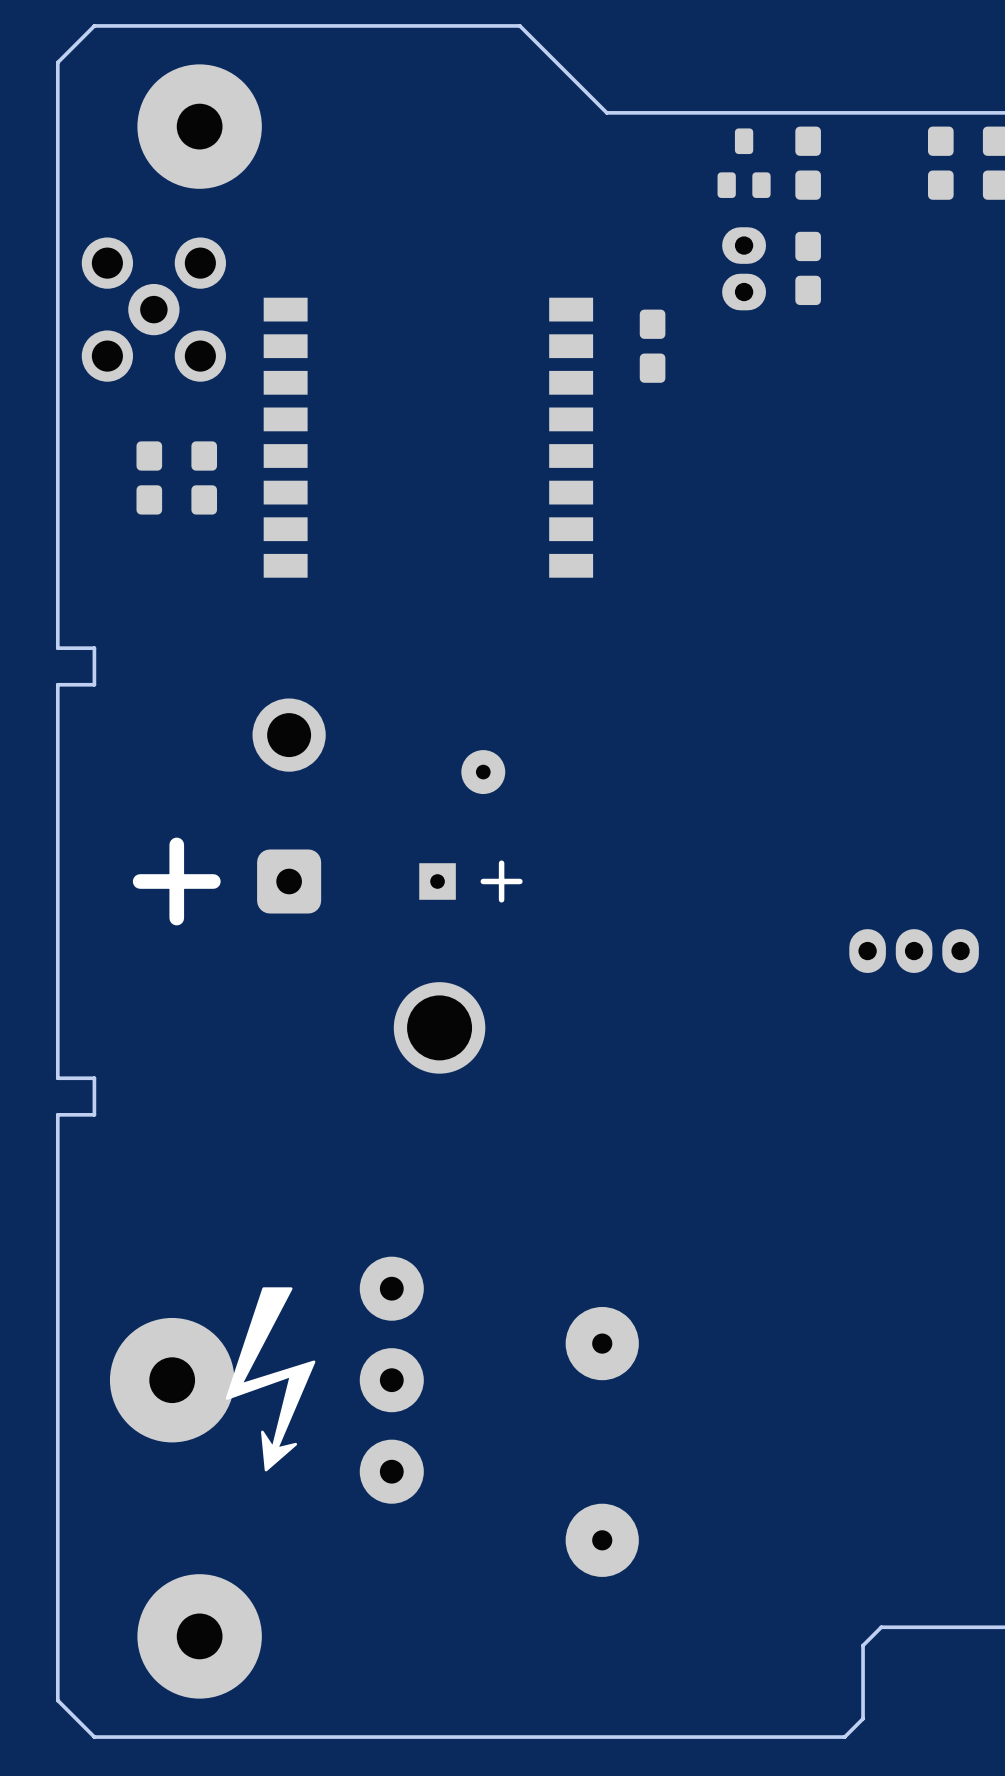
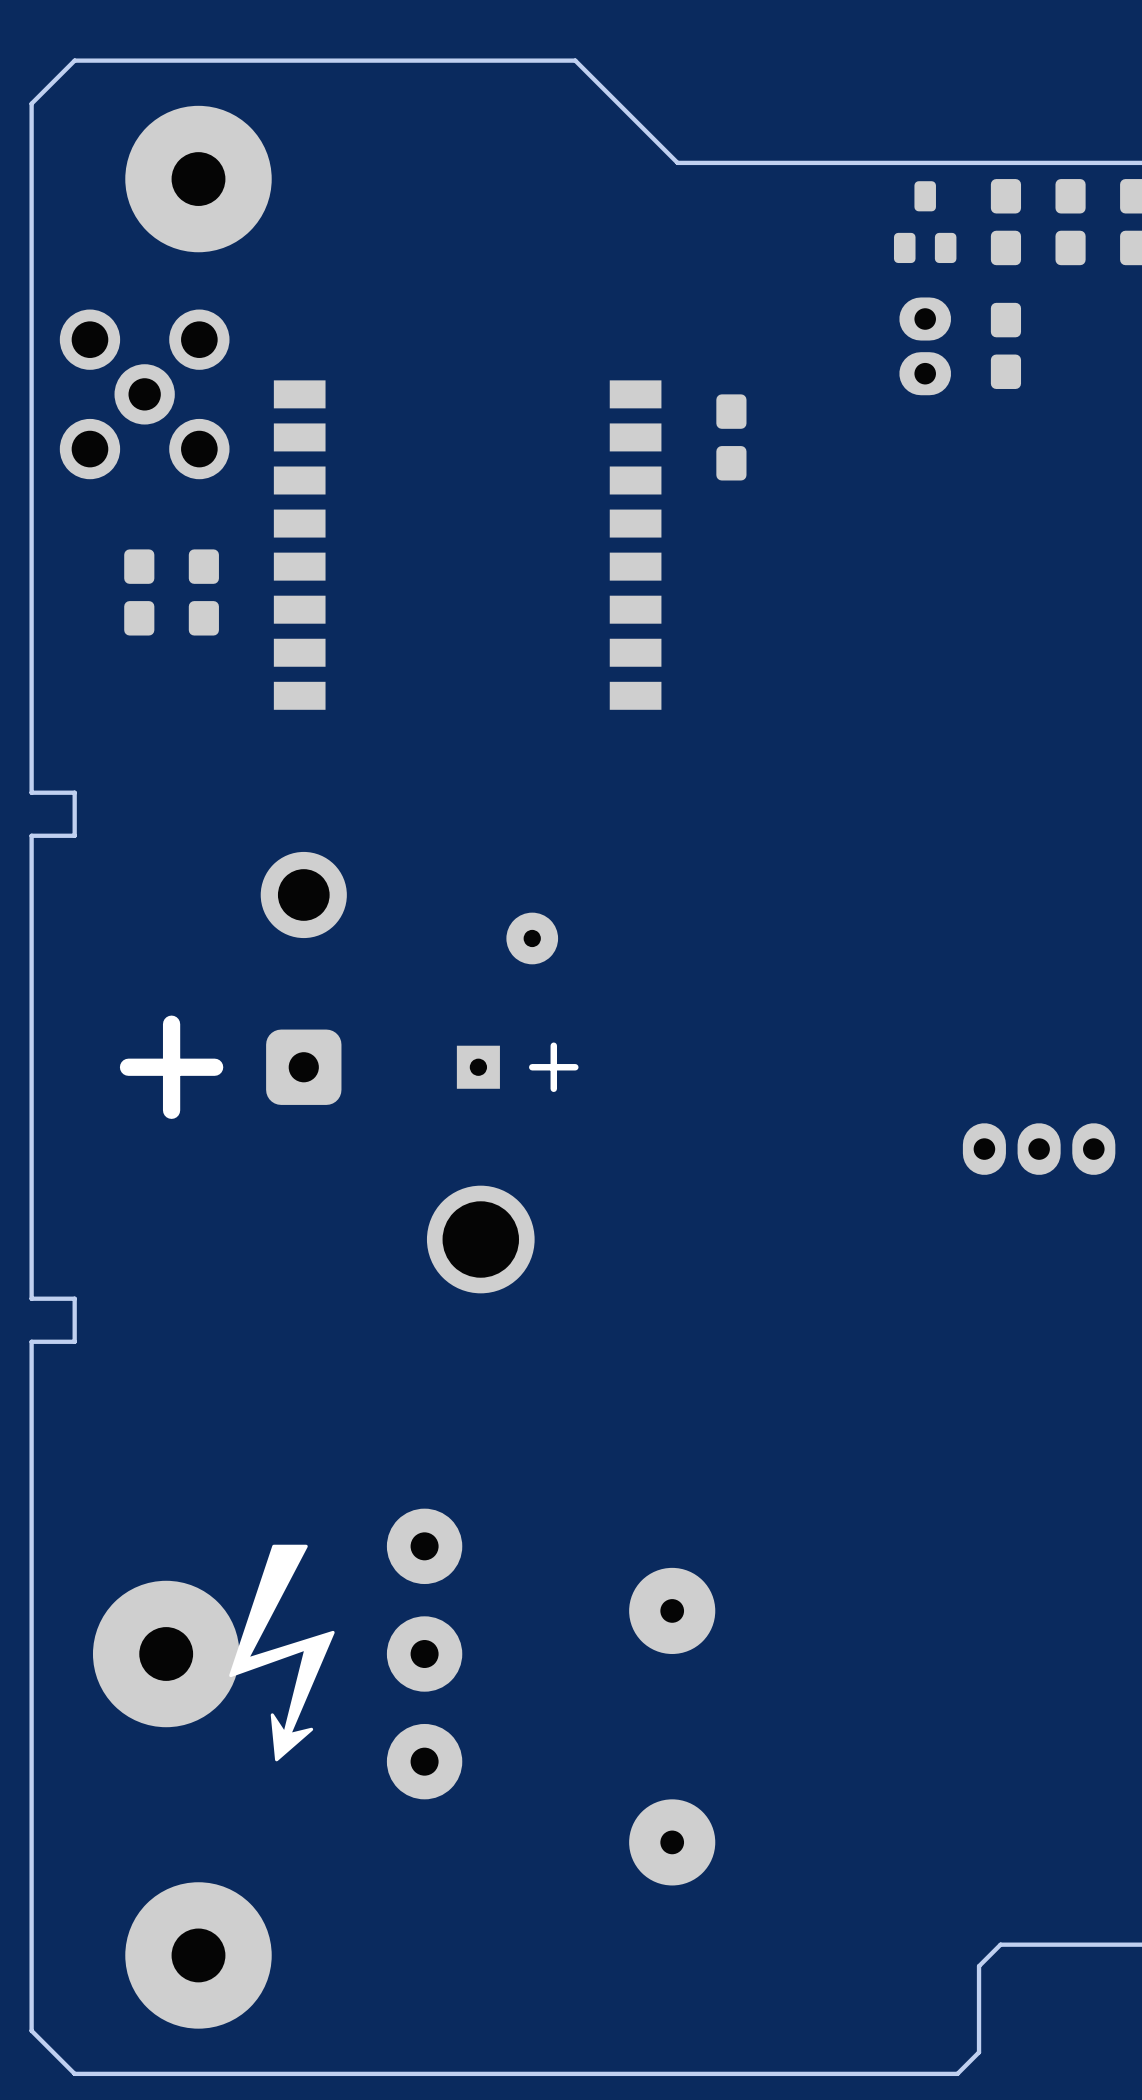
part footprint: [795, 126, 821, 200] -> [893, 181, 957, 264]
part: (744, 163) -> none
part: none -> (1005, 222)
part footprint: [795, 231, 821, 306] -> [899, 297, 952, 396]
part: (744, 268) -> none
part: none -> (1005, 345)

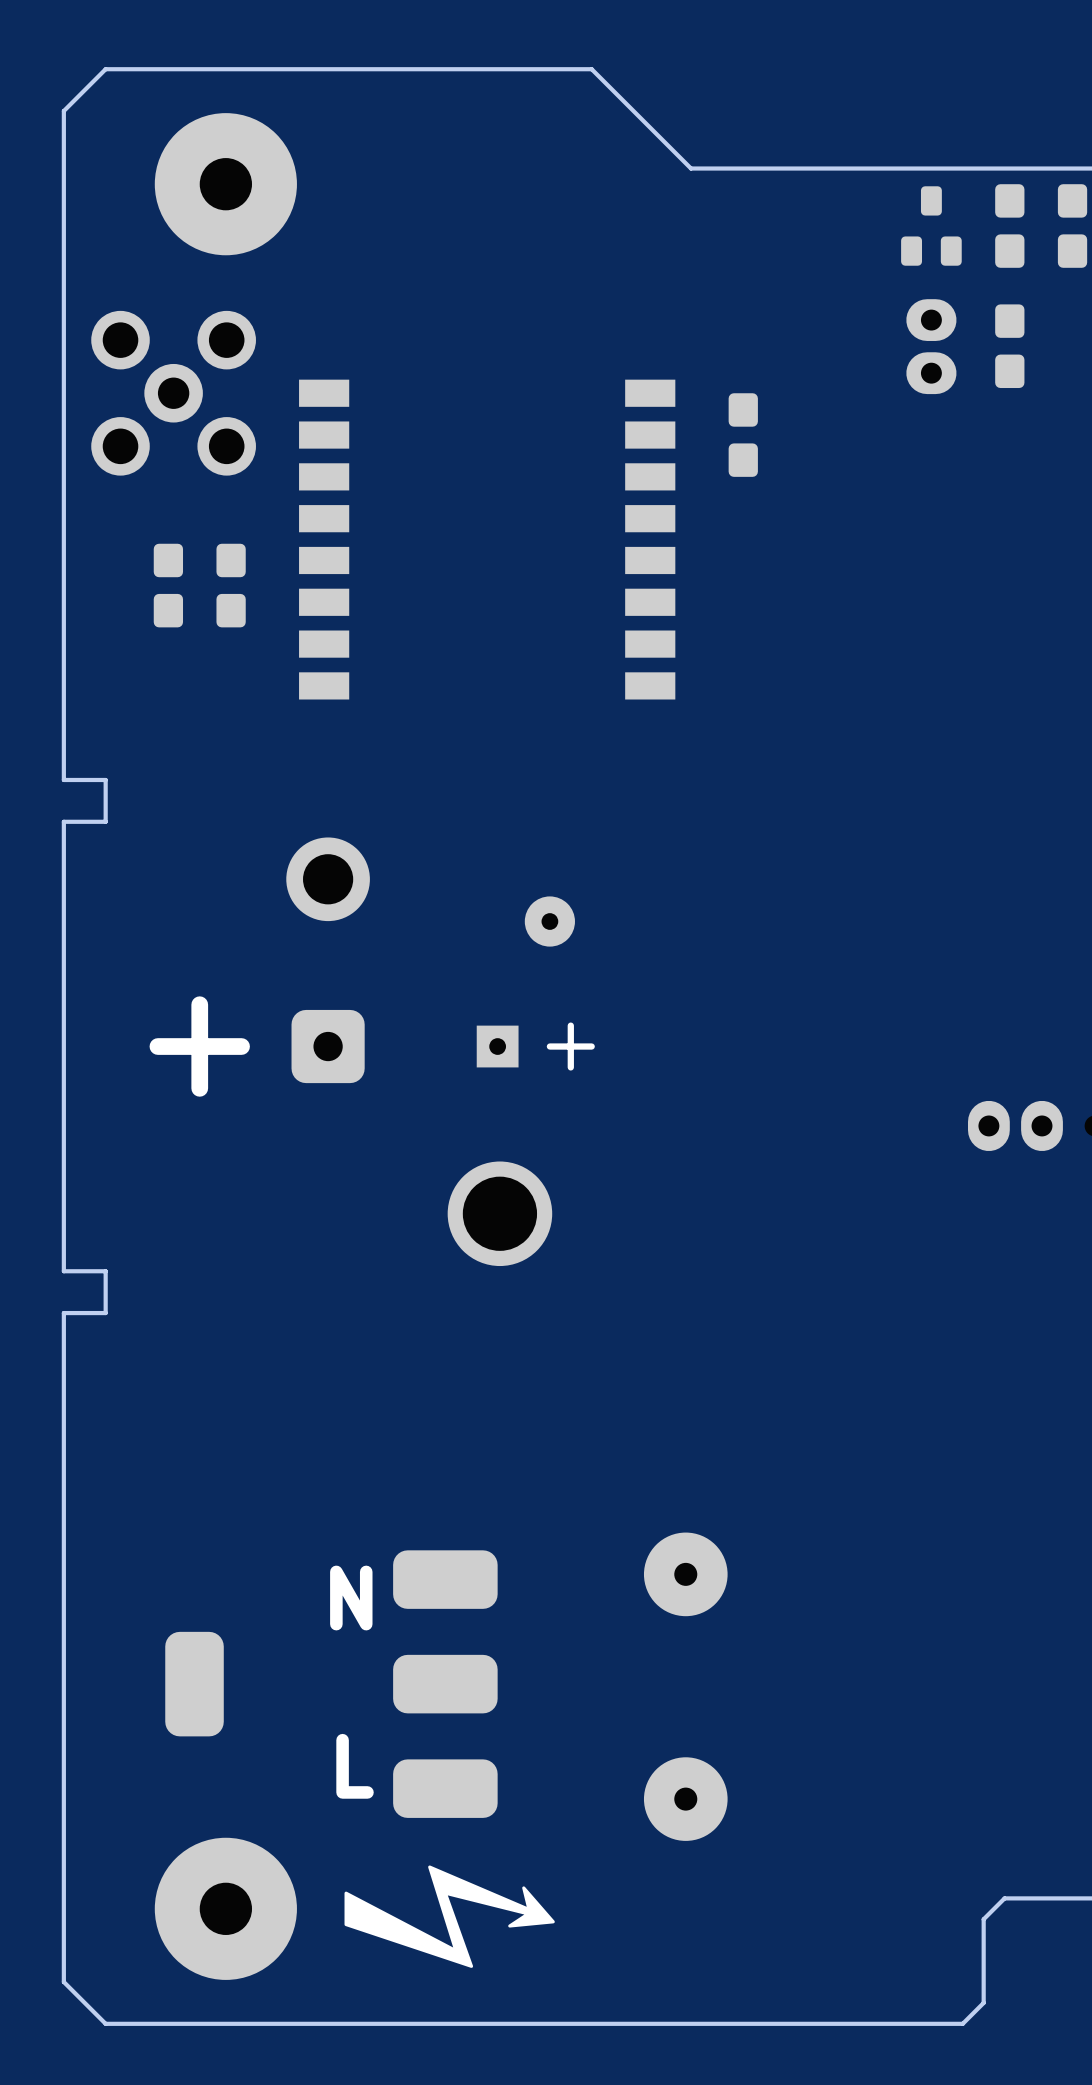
drawing: [229, 1544, 335, 1762] -> none
text: none -> N (351, 1598)
part: (166, 1654) -> none
part: (424, 1654) -> none
part: none -> (194, 1684)
part: none -> (445, 1684)
text: none -> L (355, 1766)
drawing: none -> [344, 1865, 555, 1968]

